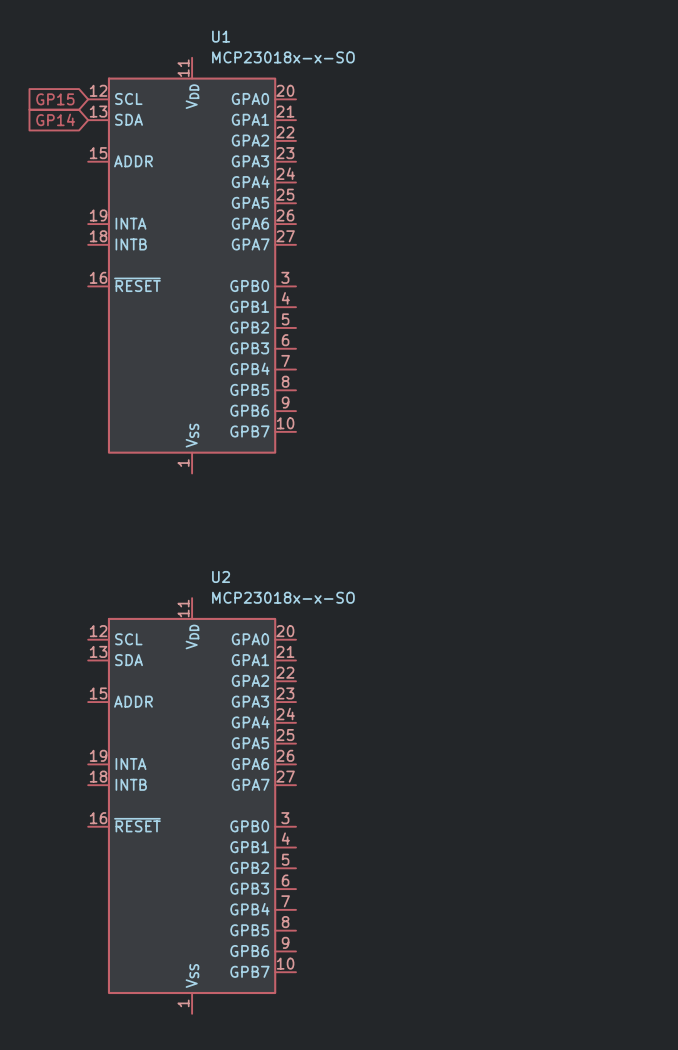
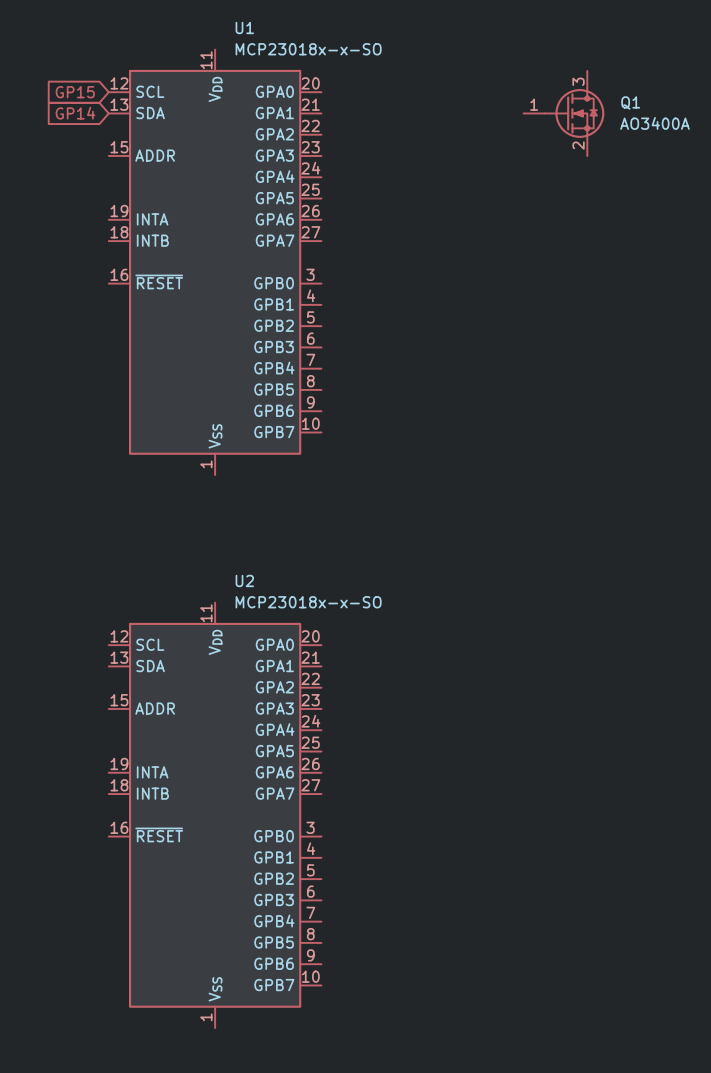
Q1: none -> AO3400A (563, 113)

